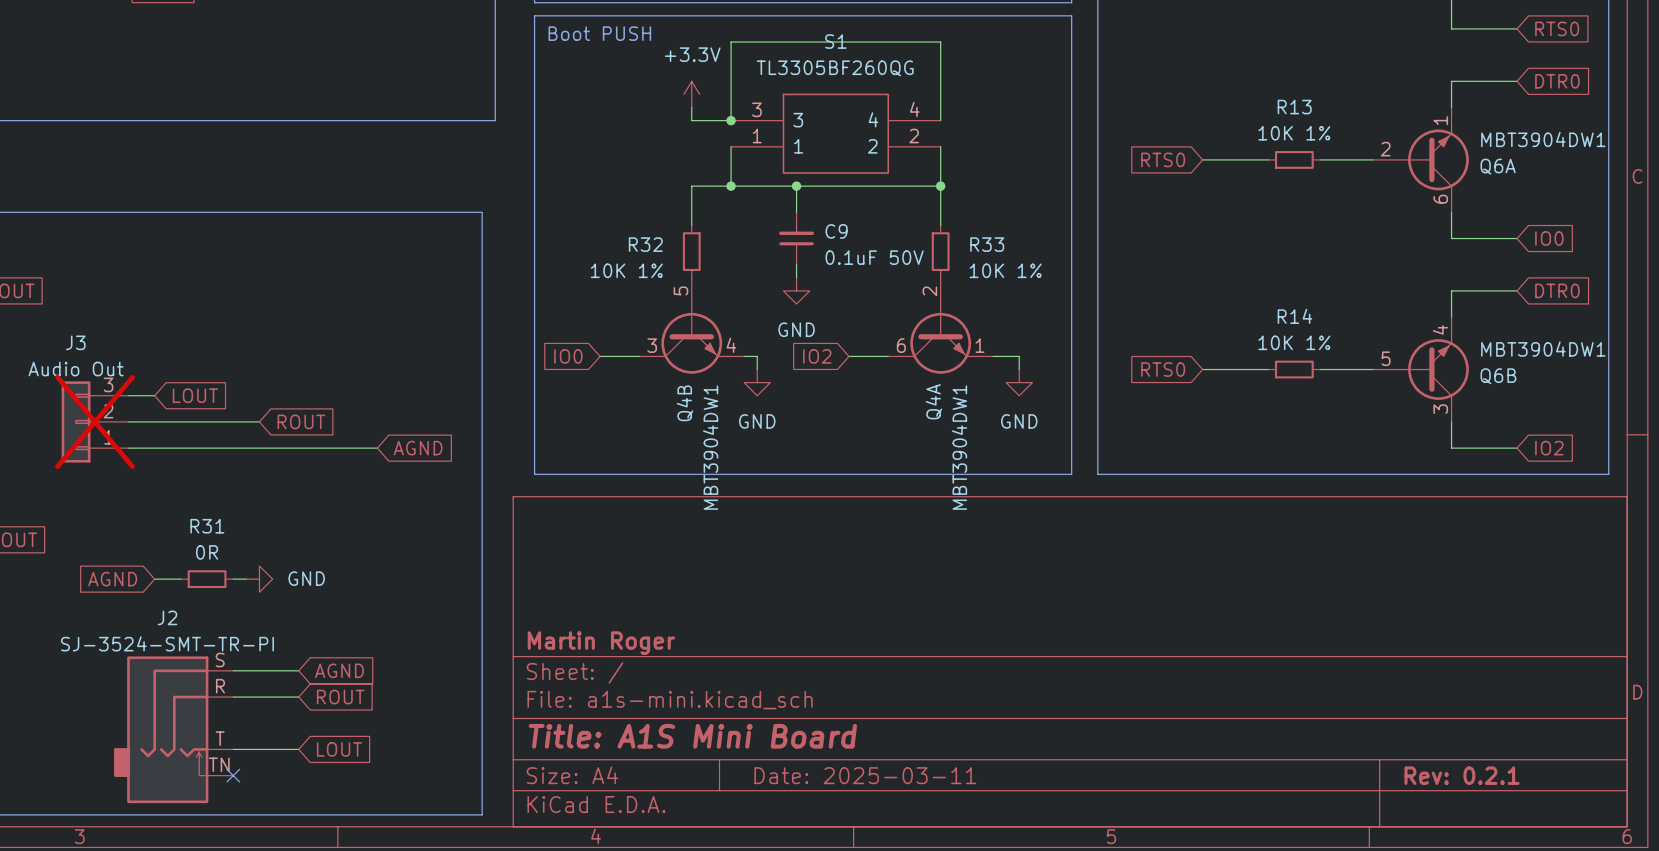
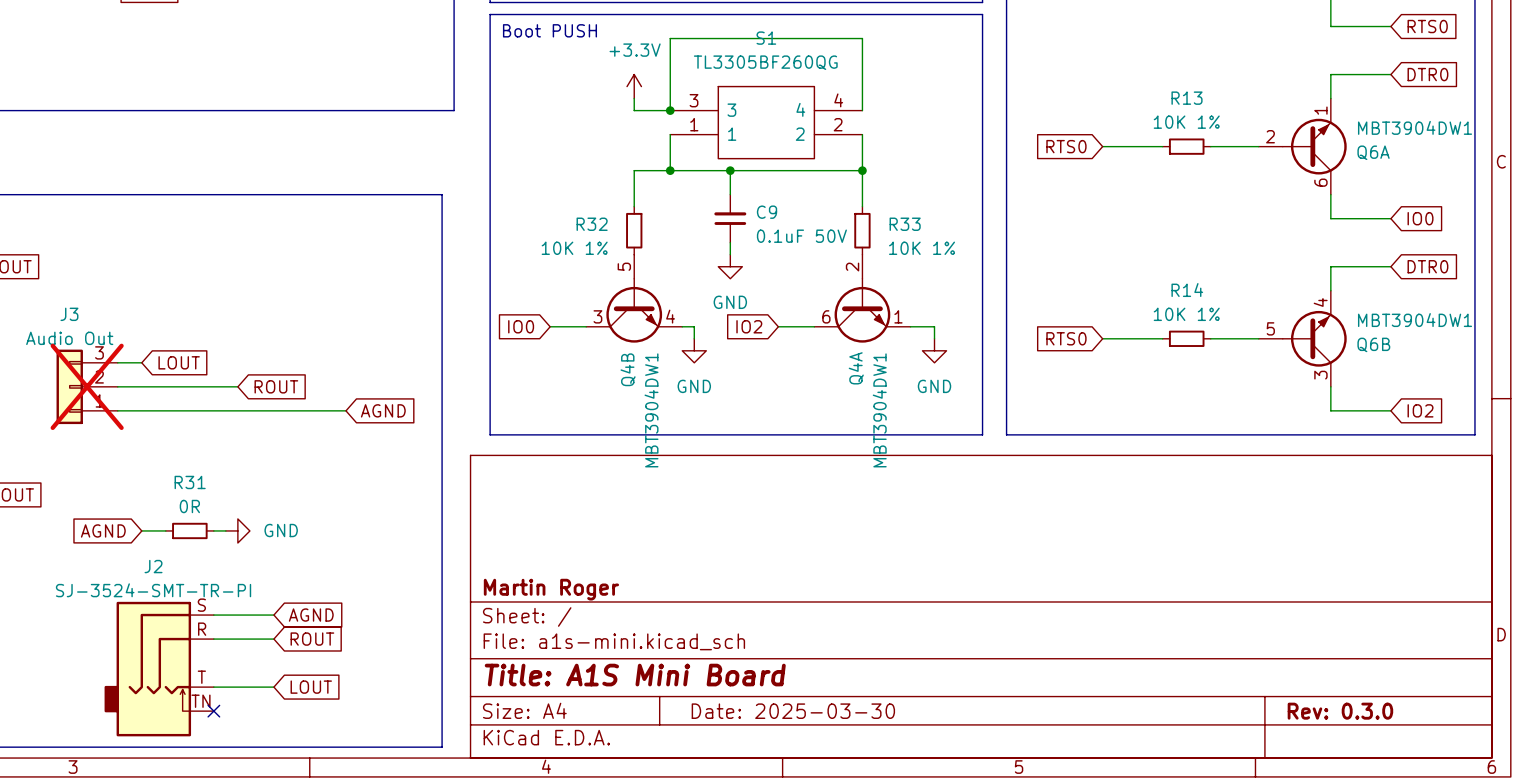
title block: Date: 2025-03-11 (865, 775) -> Date: 2025-03-30 (793, 711)
title block: Rev: 0.2.1 (1462, 775) -> Rev: 0.3.0 (1340, 711)

